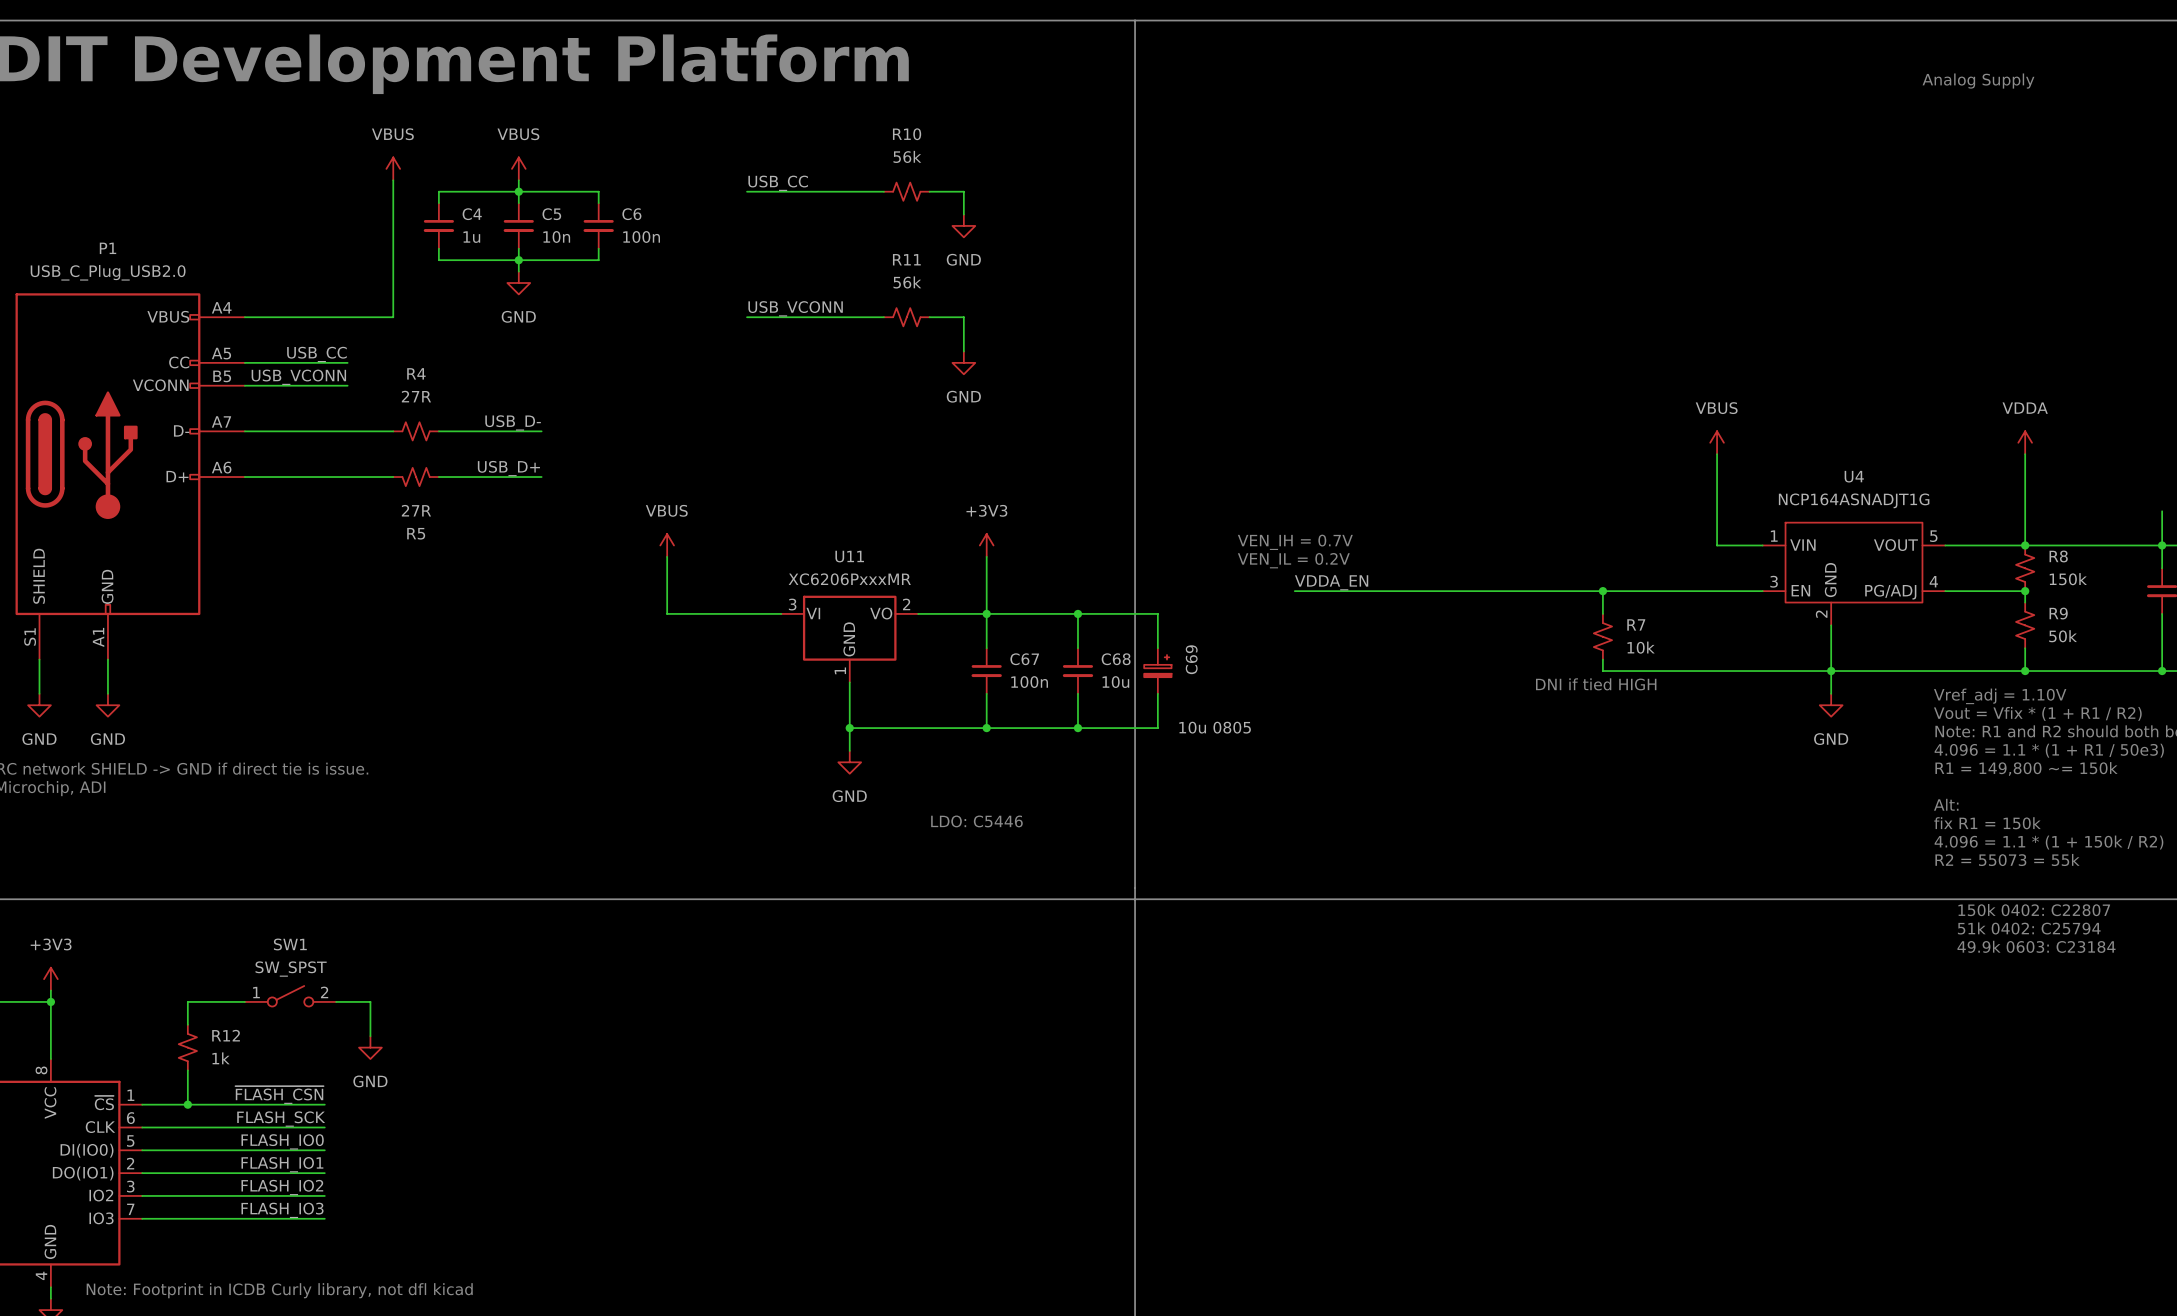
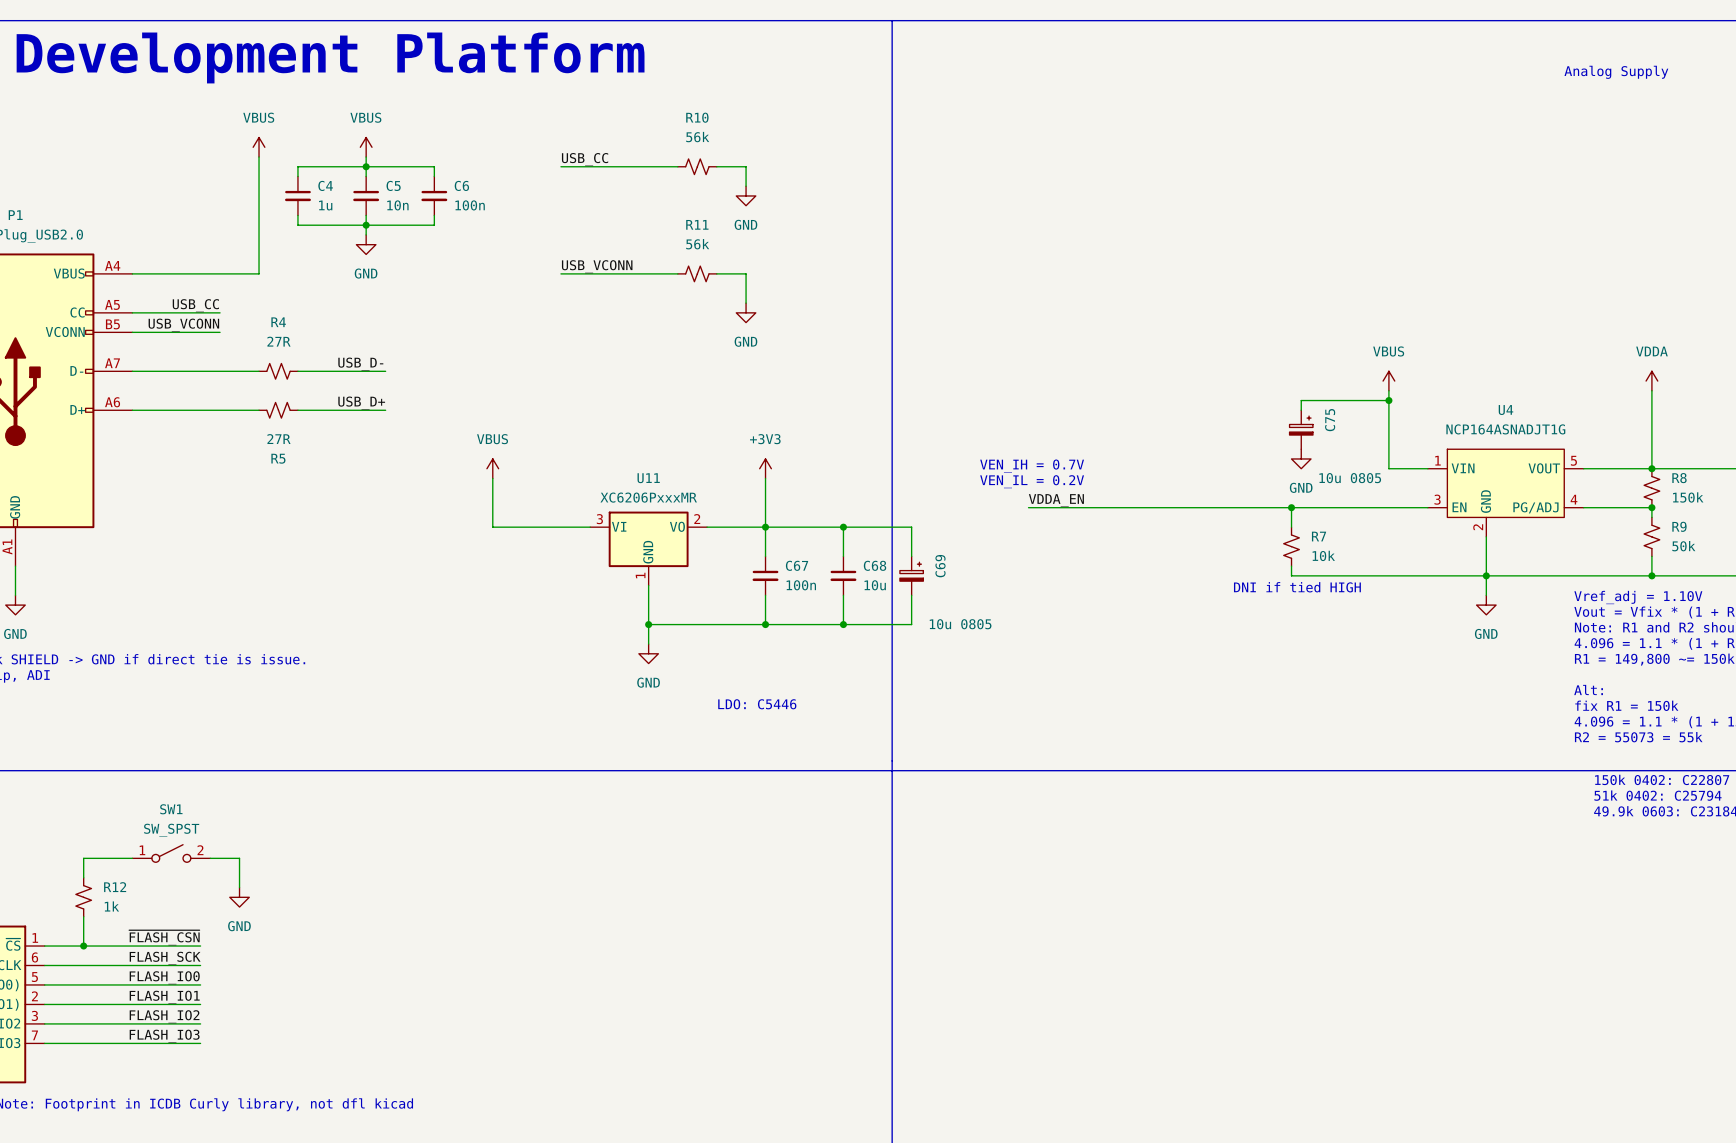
wire: none -> (1388, 400) (1301, 400) (1301, 410)
junction: none -> (1388, 400)
C75: none -> 10u 0805 (1301, 429)
power symbol: none -> GND (1301, 458)

